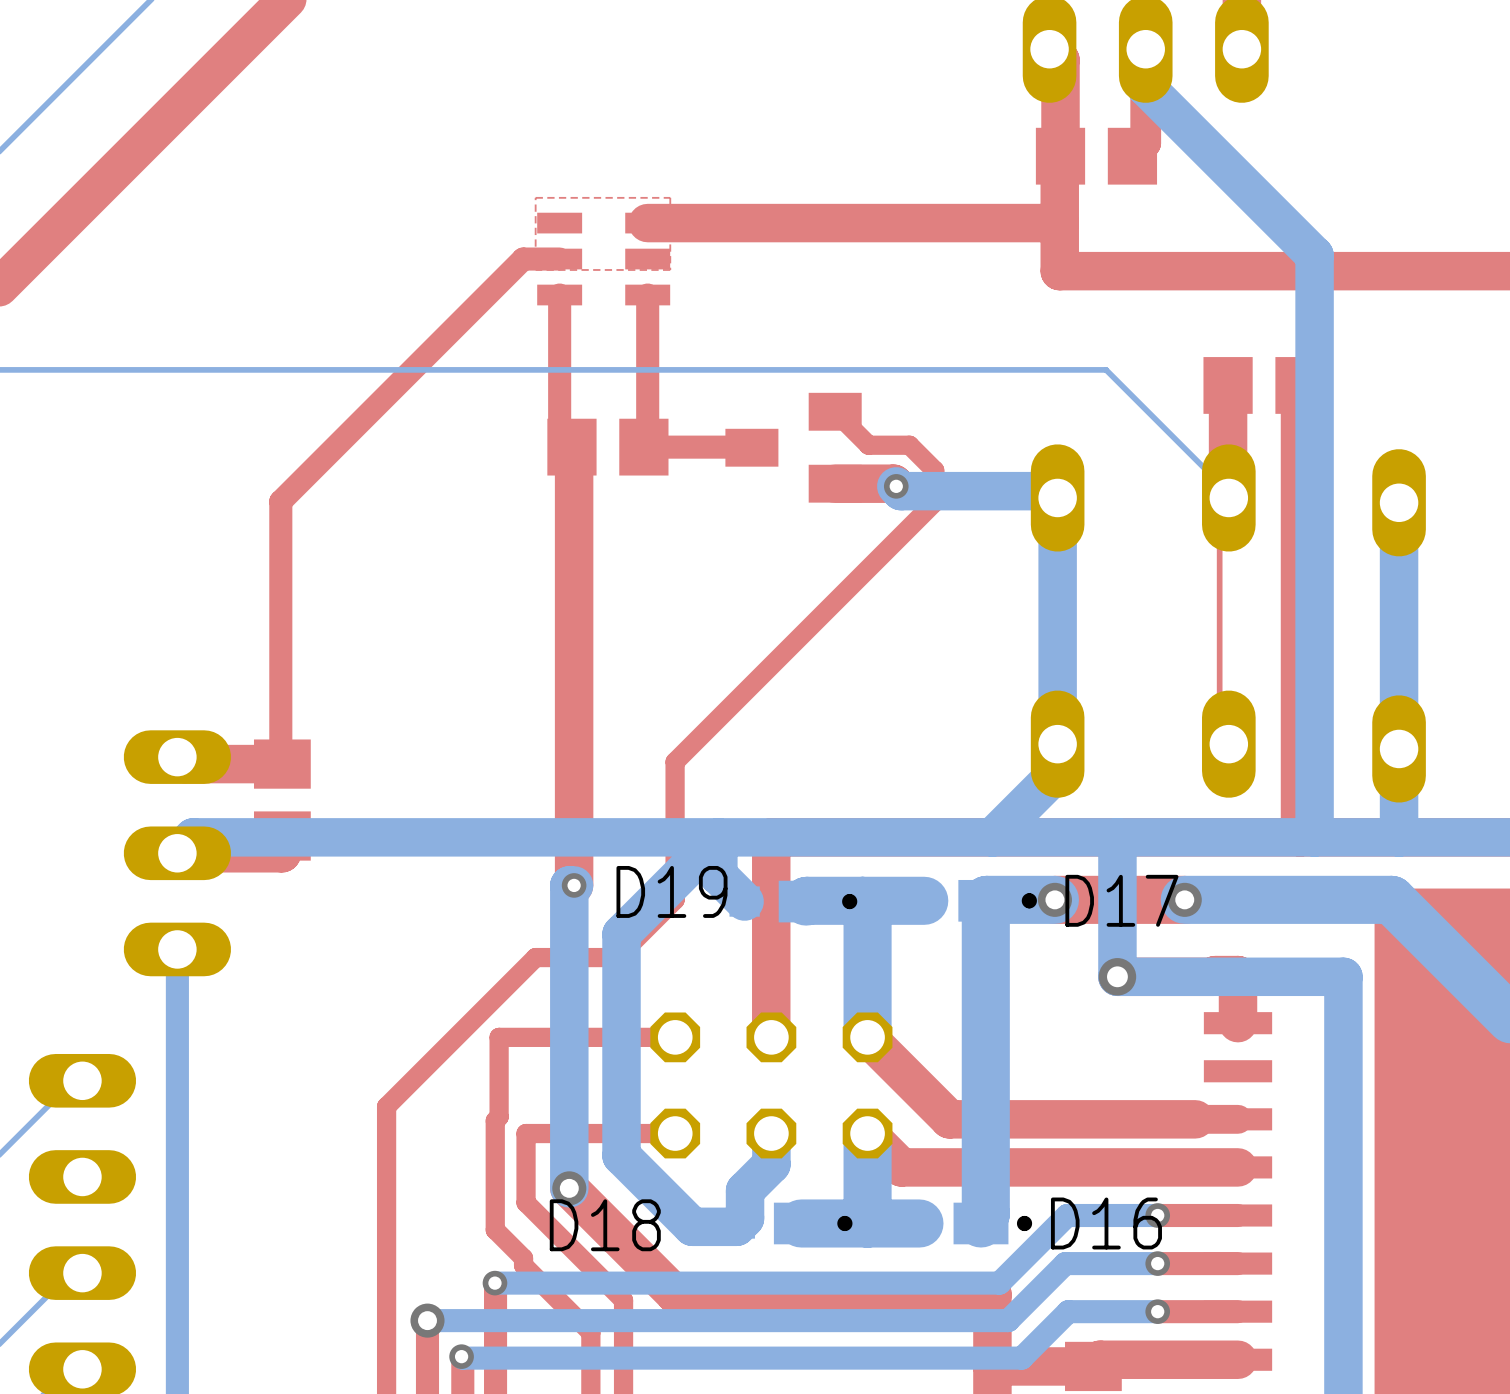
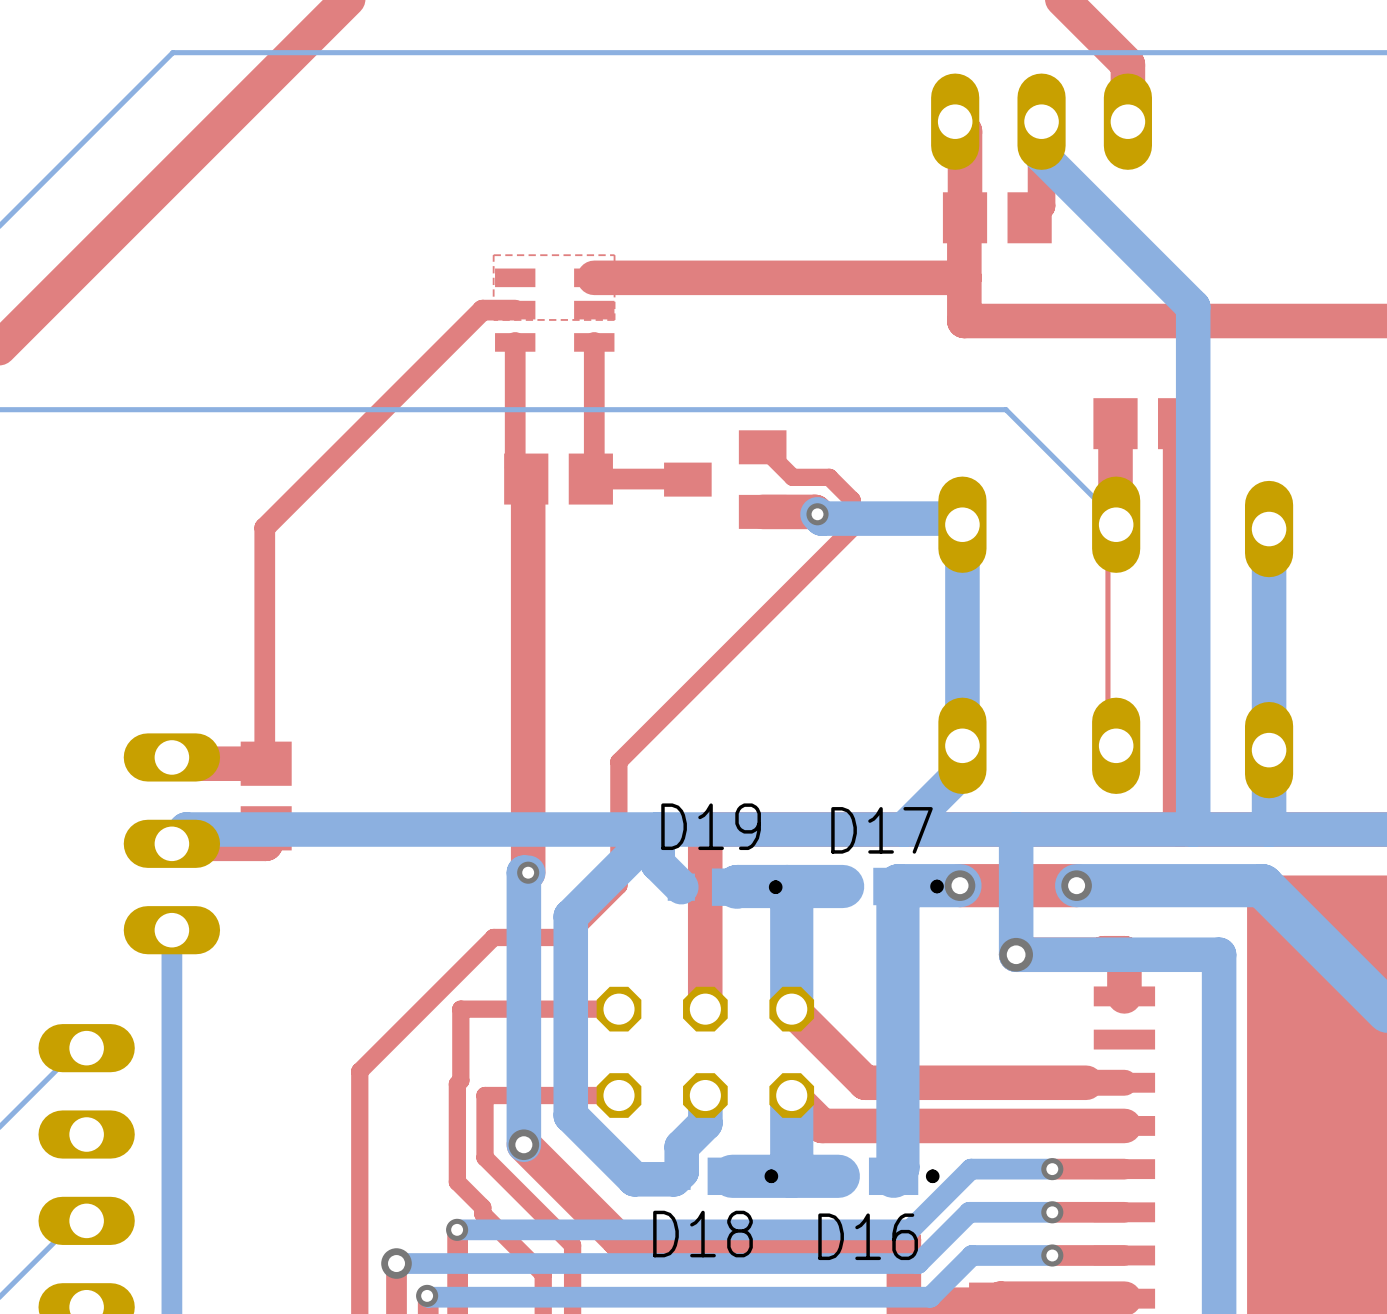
D19 name position: D19 (671, 891) -> D19 (711, 826)
D17 name position: D17 (1121, 900) -> D17 (881, 830)
D16 name position: D16 (1106, 1223) -> D16 (868, 1236)
D18 name position: D18 (605, 1225) -> D18 (703, 1234)

